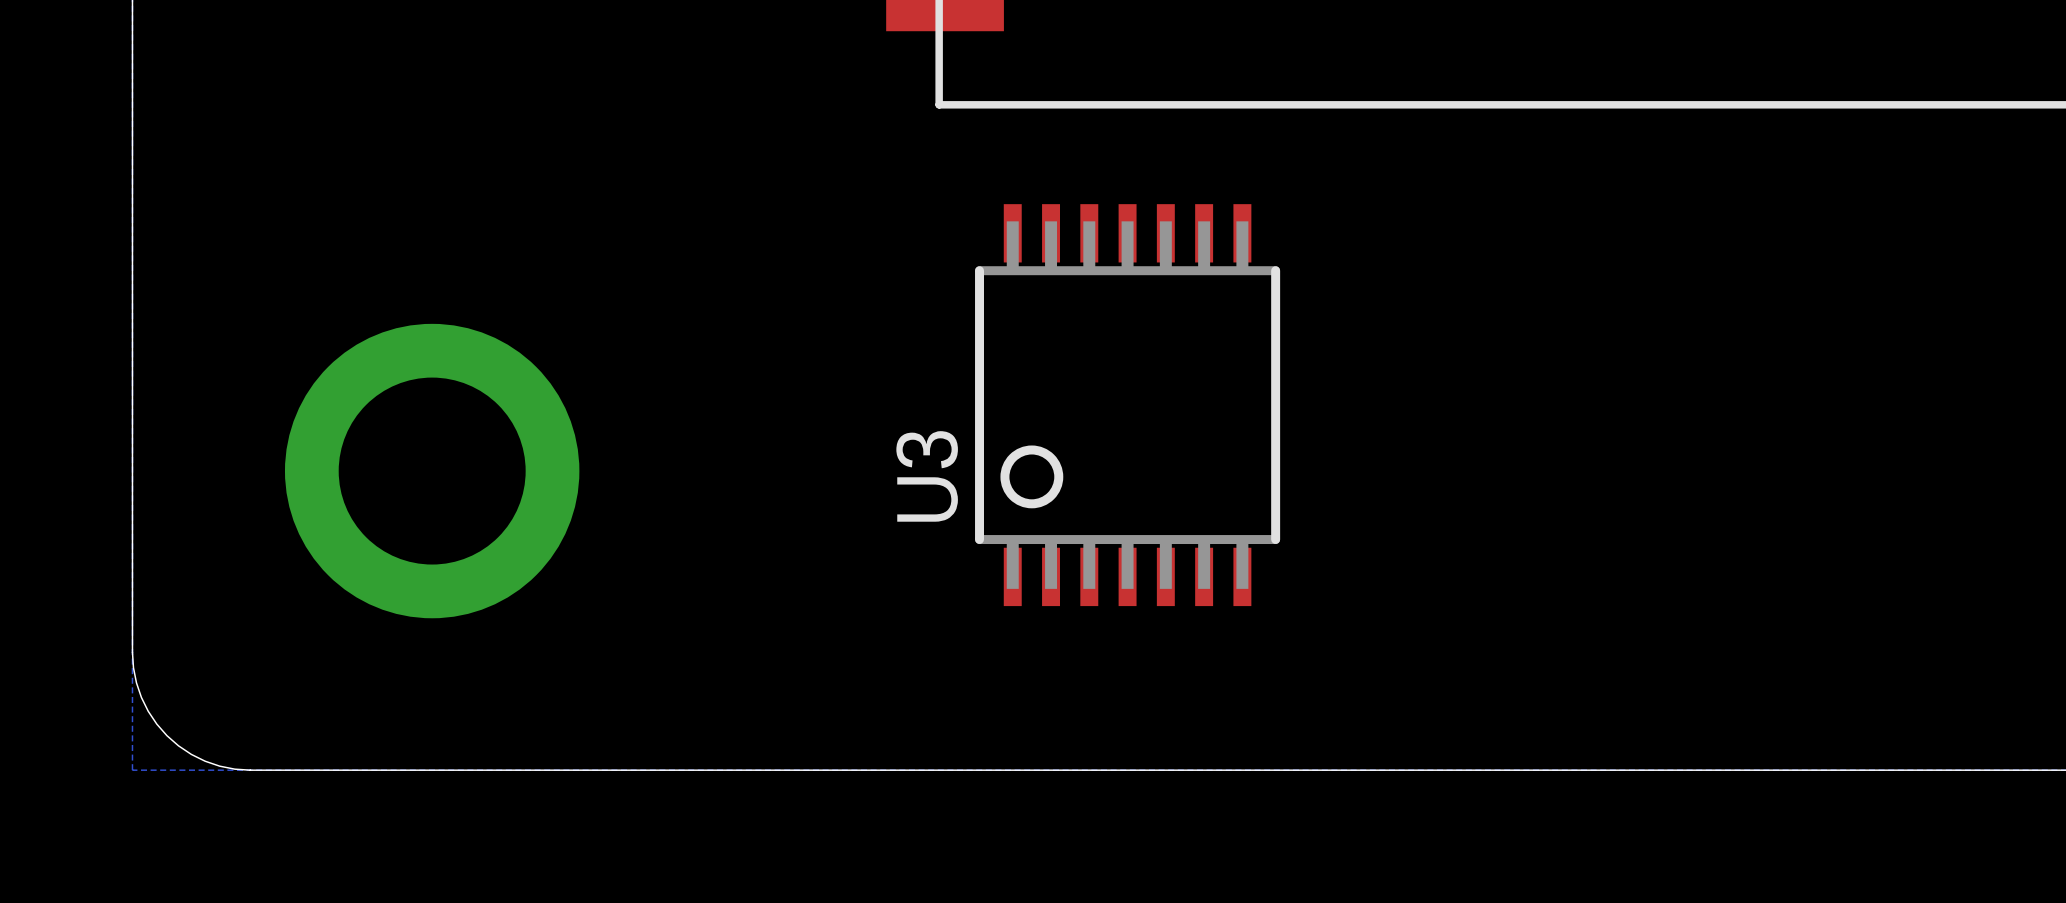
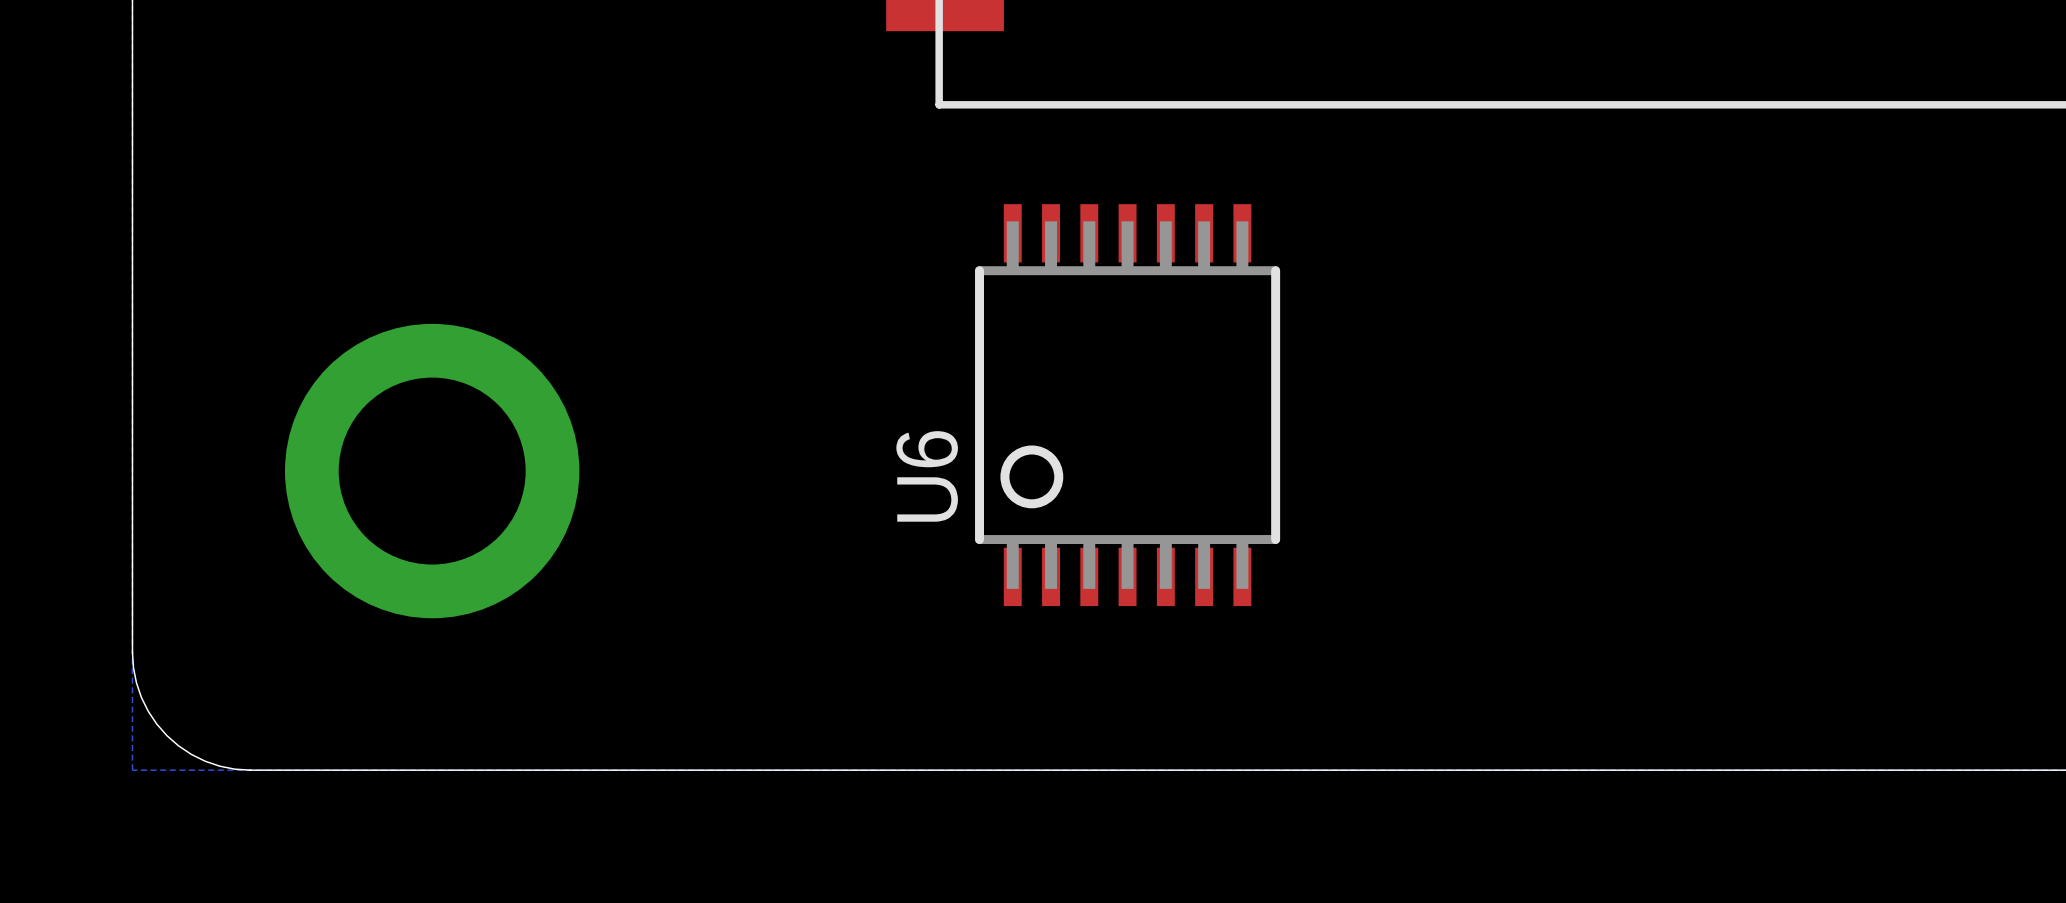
U3 name: U3 (927, 476) -> U6 (927, 476)

